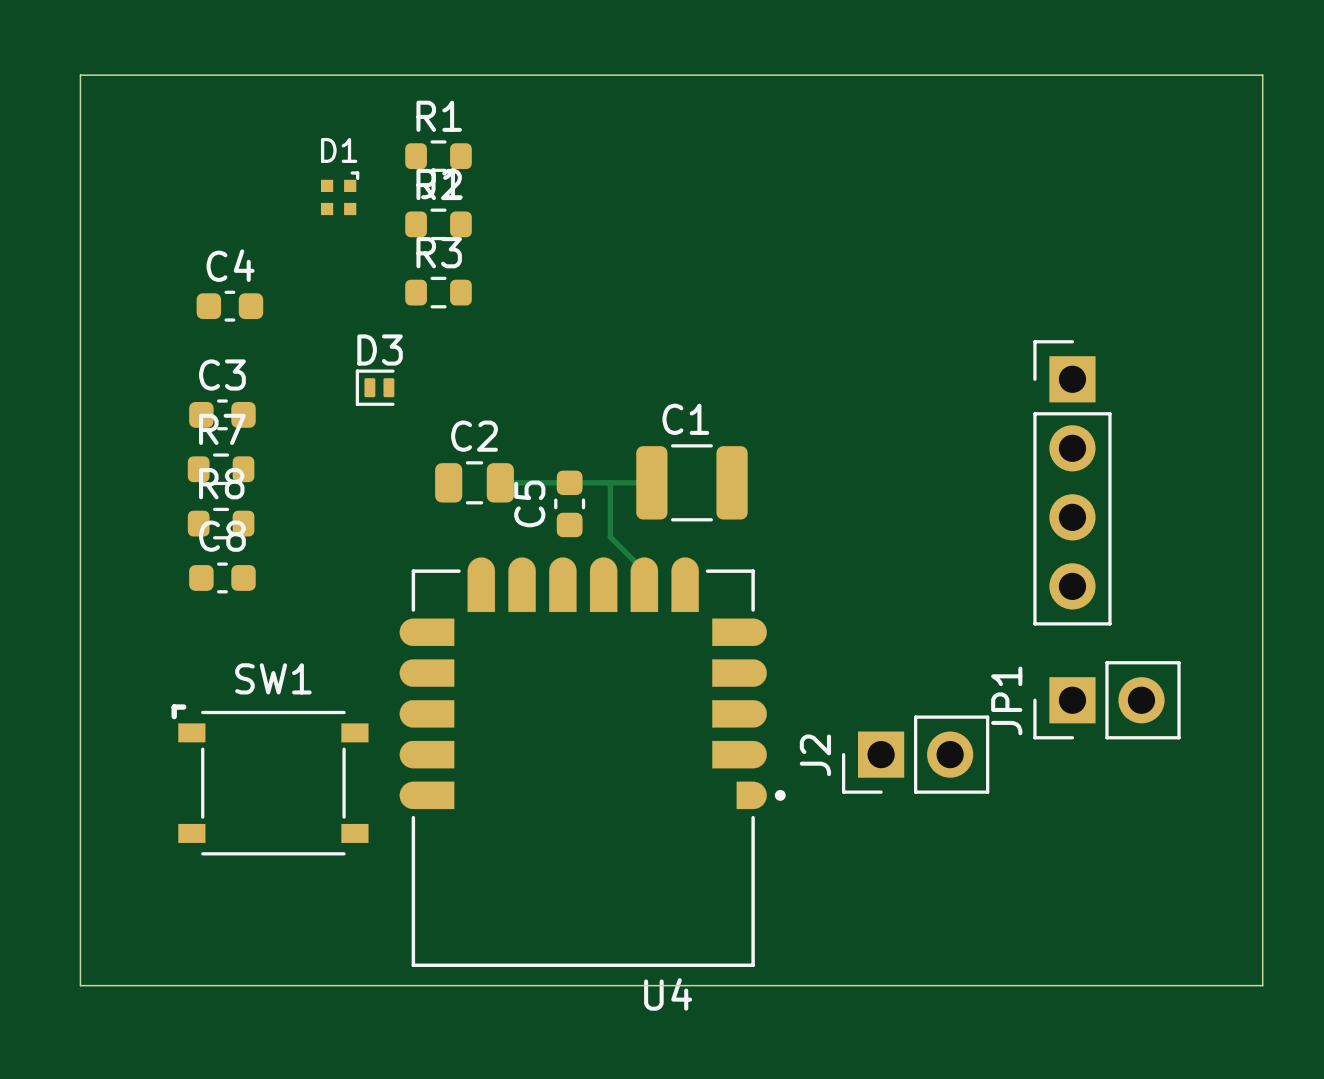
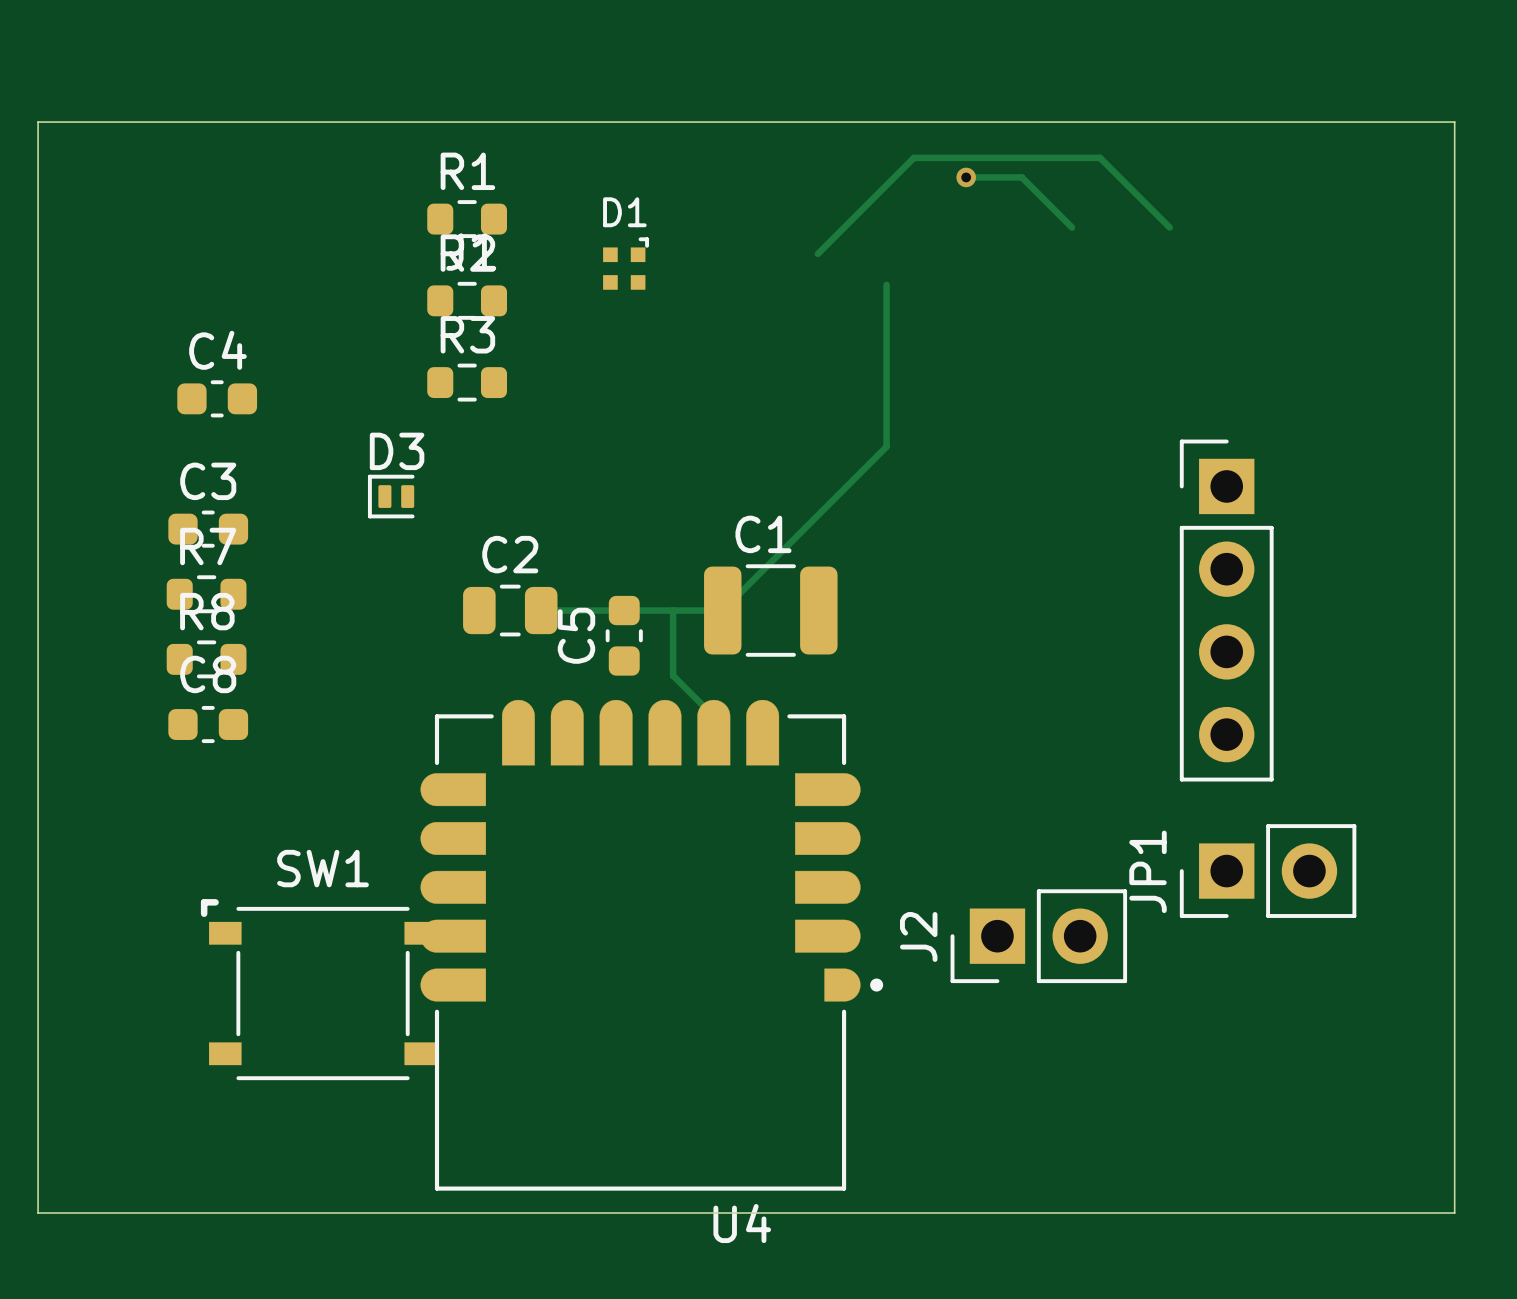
track: none -> (966, 177) (1021, 177) (1072, 227)
via: none -> (966, 177)
track: none -> (1169, 227) (1100, 157) (913, 157) (817, 253)
D1 position: (340, 193) -> (626, 263)
track: none -> (886, 284) (886, 446) (722, 610)
SW1 position: (270, 779) -> (318, 989)

